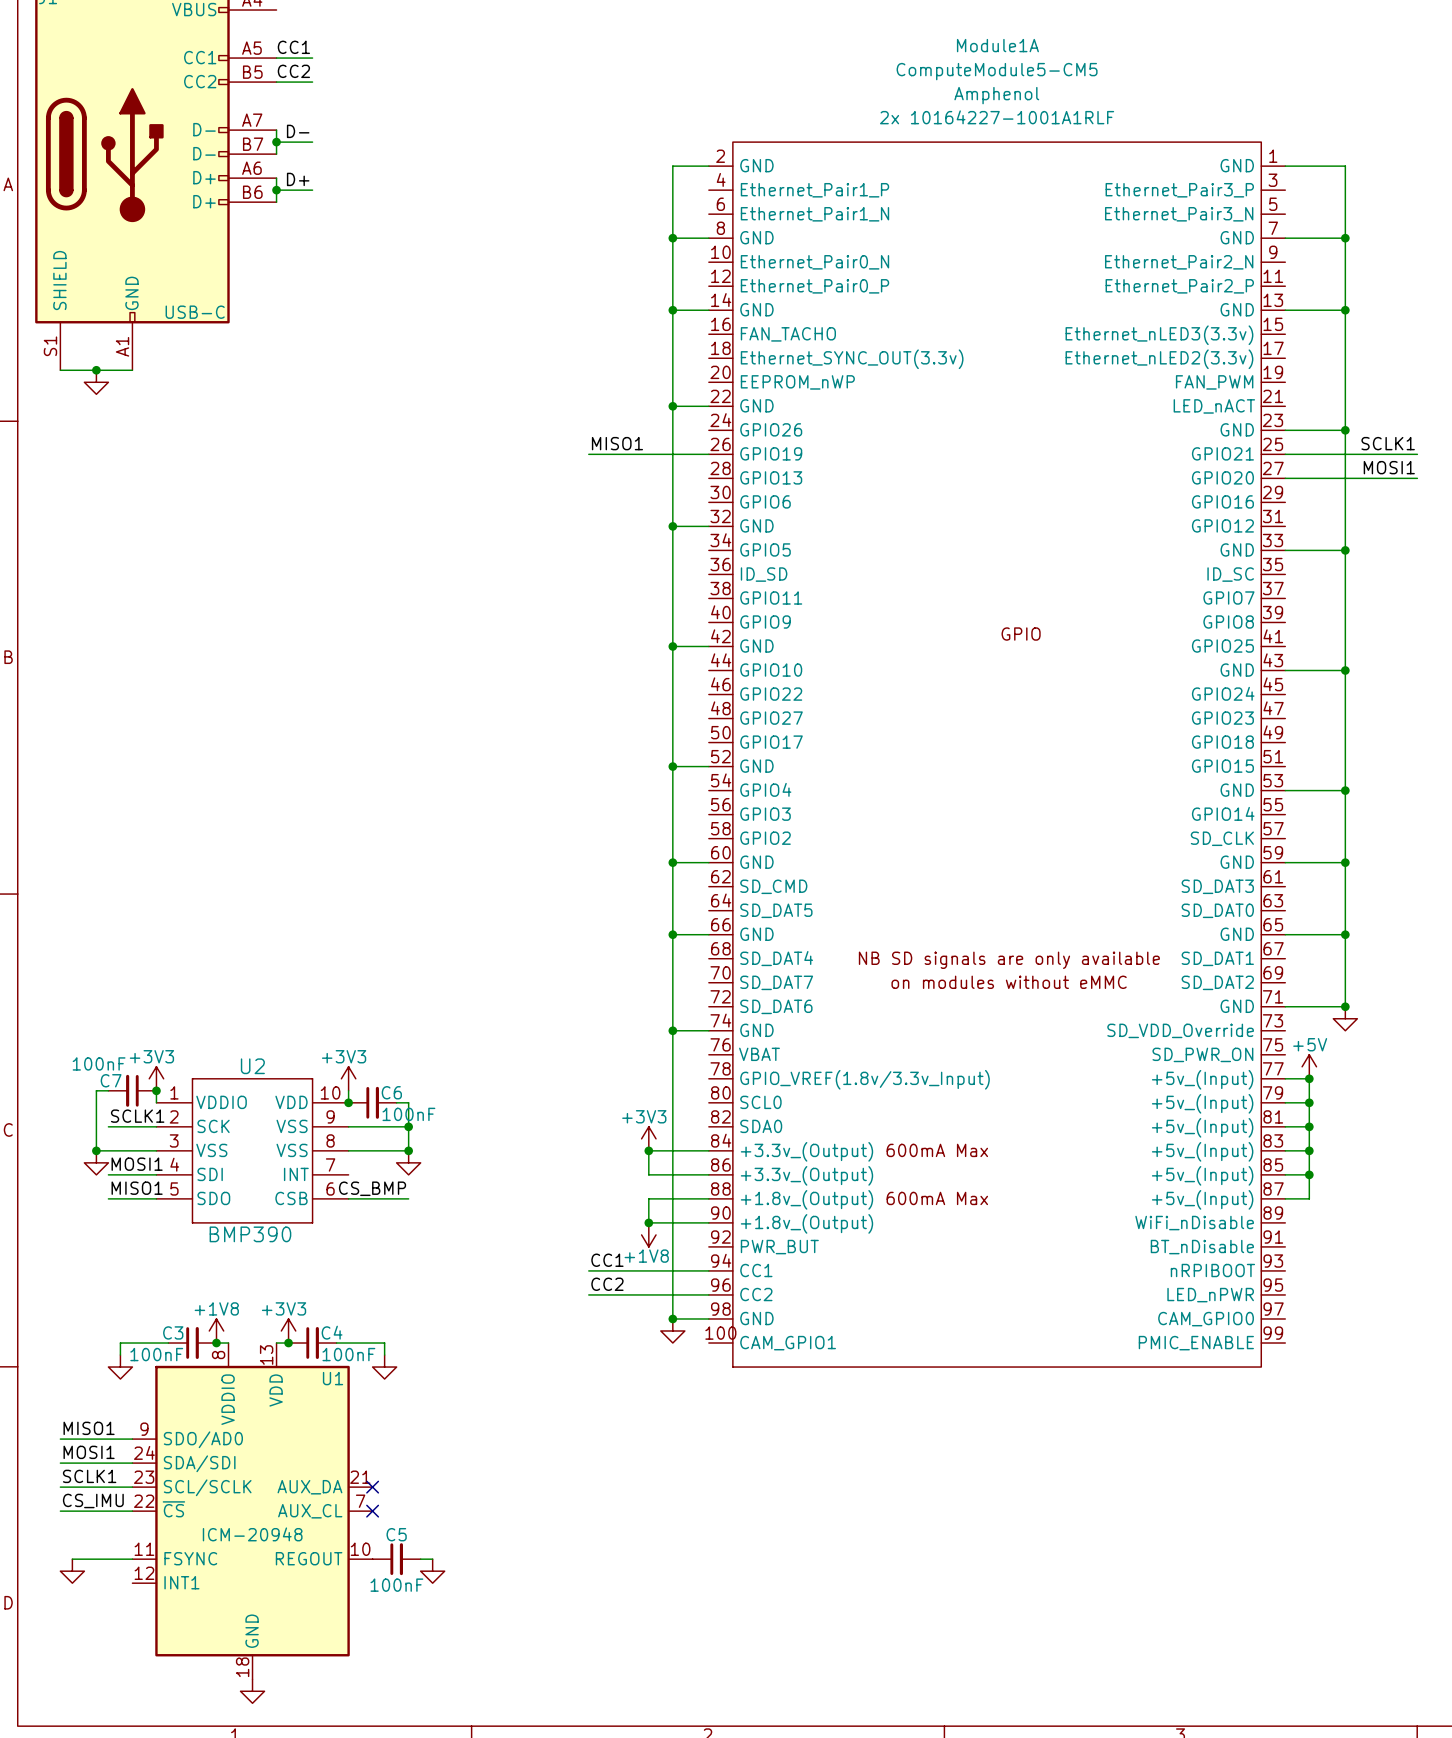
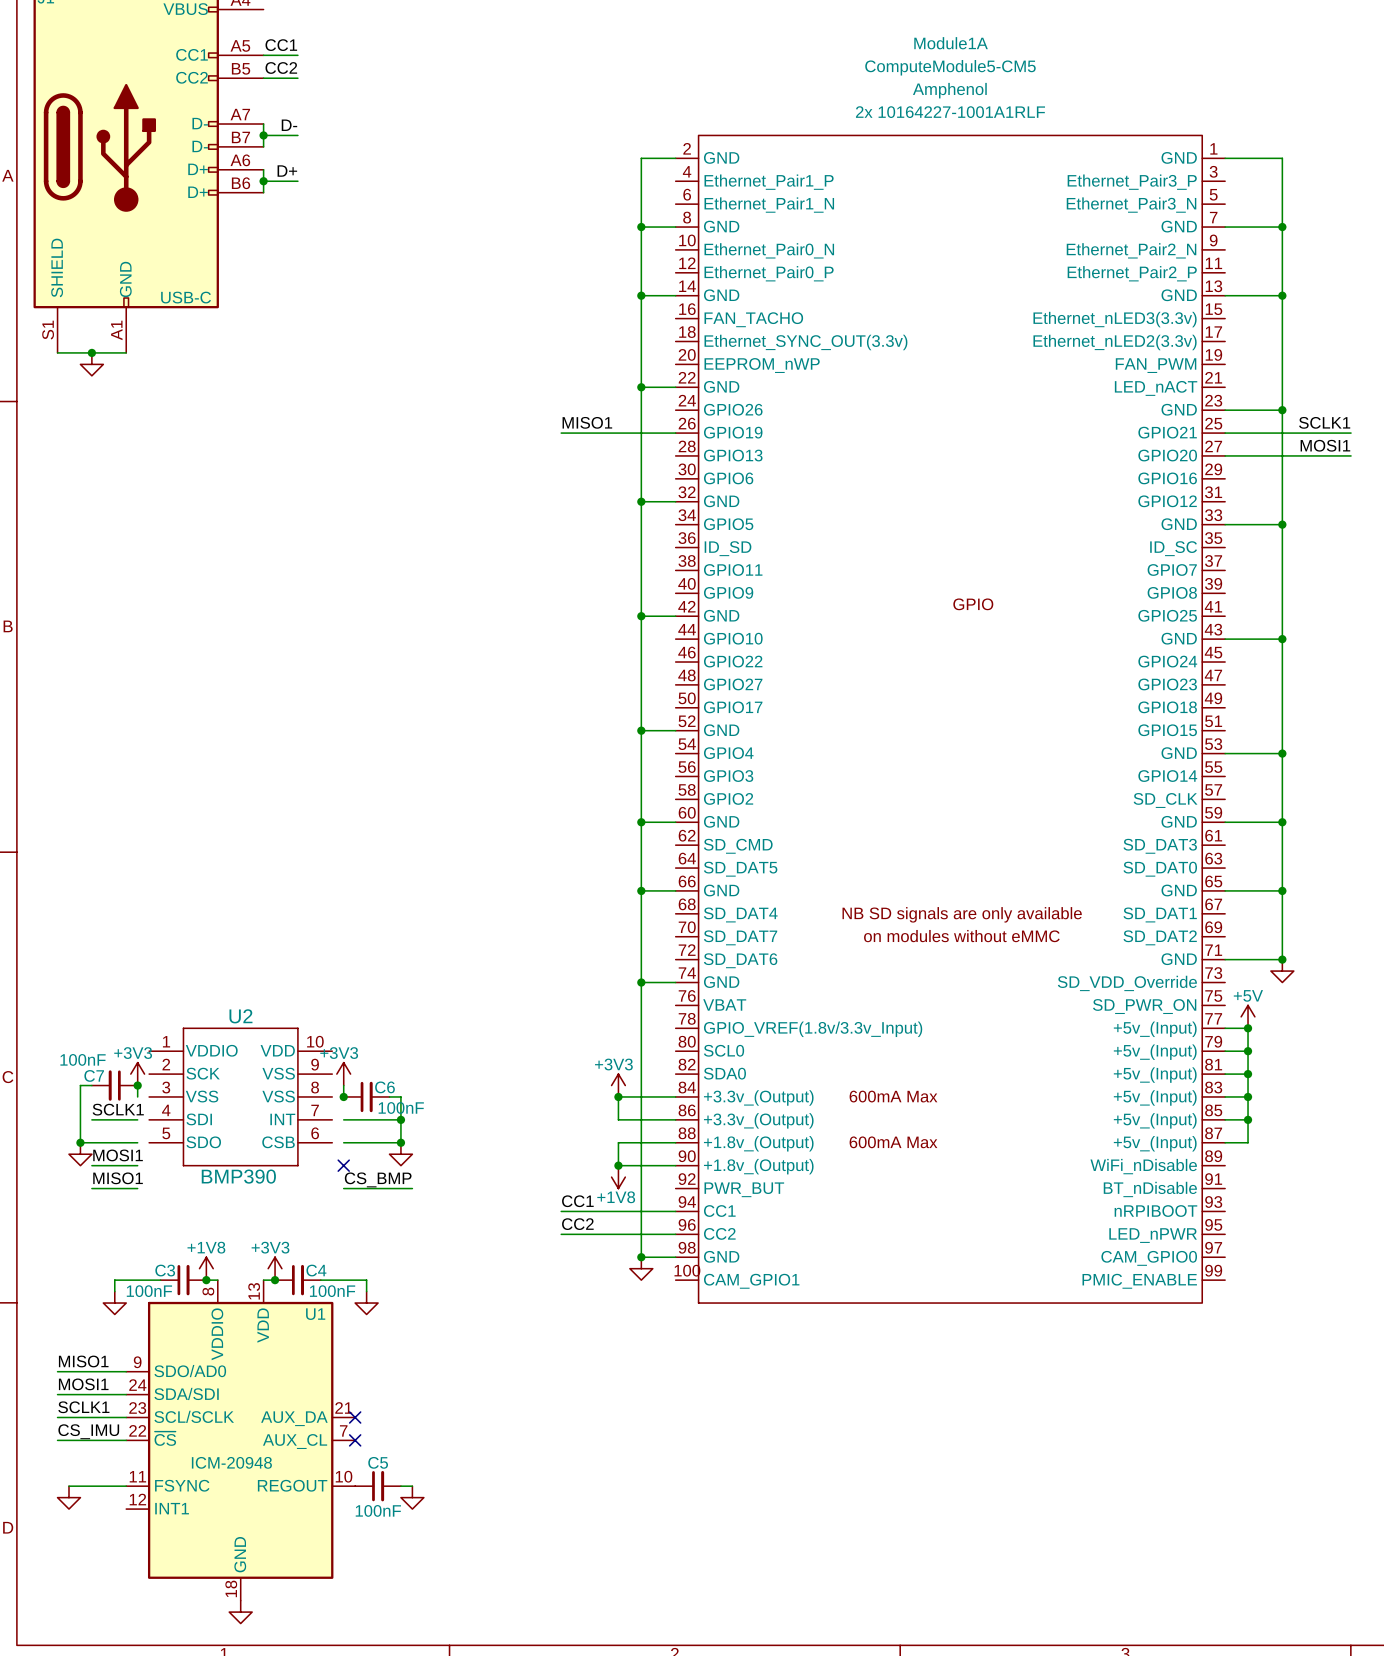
power symbol position: +3V3 (156, 1078) -> +3V3 (137, 1074)
power symbol position: +3V3 (348, 1078) -> +3V3 (343, 1074)
wire: (108, 1090) (96, 1090) (96, 1150) (156, 1150) -> none
C7 position: (132, 1090) -> (114, 1085)
wire: (156, 1090) (156, 1102) -> (137, 1085) (137, 1096)
junction: (156, 1090) -> none
wire: (348, 1090) (348, 1102) -> (343, 1085) (343, 1096)
junction: (348, 1102) -> none
C6 position: (372, 1102) -> (366, 1096)
wire: (396, 1102) (408, 1102) (408, 1150) (348, 1150) -> none
label position: SCLK1 (137, 1116) -> SCLK1 (118, 1109)
wire: (108, 1126) (156, 1126) -> (91, 1165) (137, 1165)
wire: (348, 1126) (408, 1126) -> (343, 1119) (400, 1119)
junction: (408, 1126) -> none
wire: none -> (91, 1085) (80, 1085) (80, 1142) (103, 1142)
junction: none -> (137, 1085)
junction: (96, 1150) -> none
junction: none -> (343, 1096)
wire: none -> (389, 1096) (400, 1096) (400, 1142) (389, 1142)
junction: (408, 1150) -> none
power symbol position: (96, 1162) -> (80, 1154)
power symbol position: (408, 1162) -> (400, 1154)
label position: MOSI1 (137, 1164) -> MOSI1 (118, 1155)
wire: (144, 1174) (156, 1174) -> (91, 1119) (103, 1119)
junction: none -> (400, 1119)
label position: MISO1 (137, 1188) -> MISO1 (118, 1178)
label position: CS_BMP (372, 1188) -> CS_BMP (378, 1179)
junction: none -> (80, 1142)
wire: (144, 1198) (156, 1198) -> none
wire: (348, 1198) (360, 1198) -> none
junction: none -> (400, 1142)
no-connect mark: none -> (343, 1165)
wire: none -> (91, 1188) (137, 1188)
wire: none -> (343, 1188) (412, 1188)

